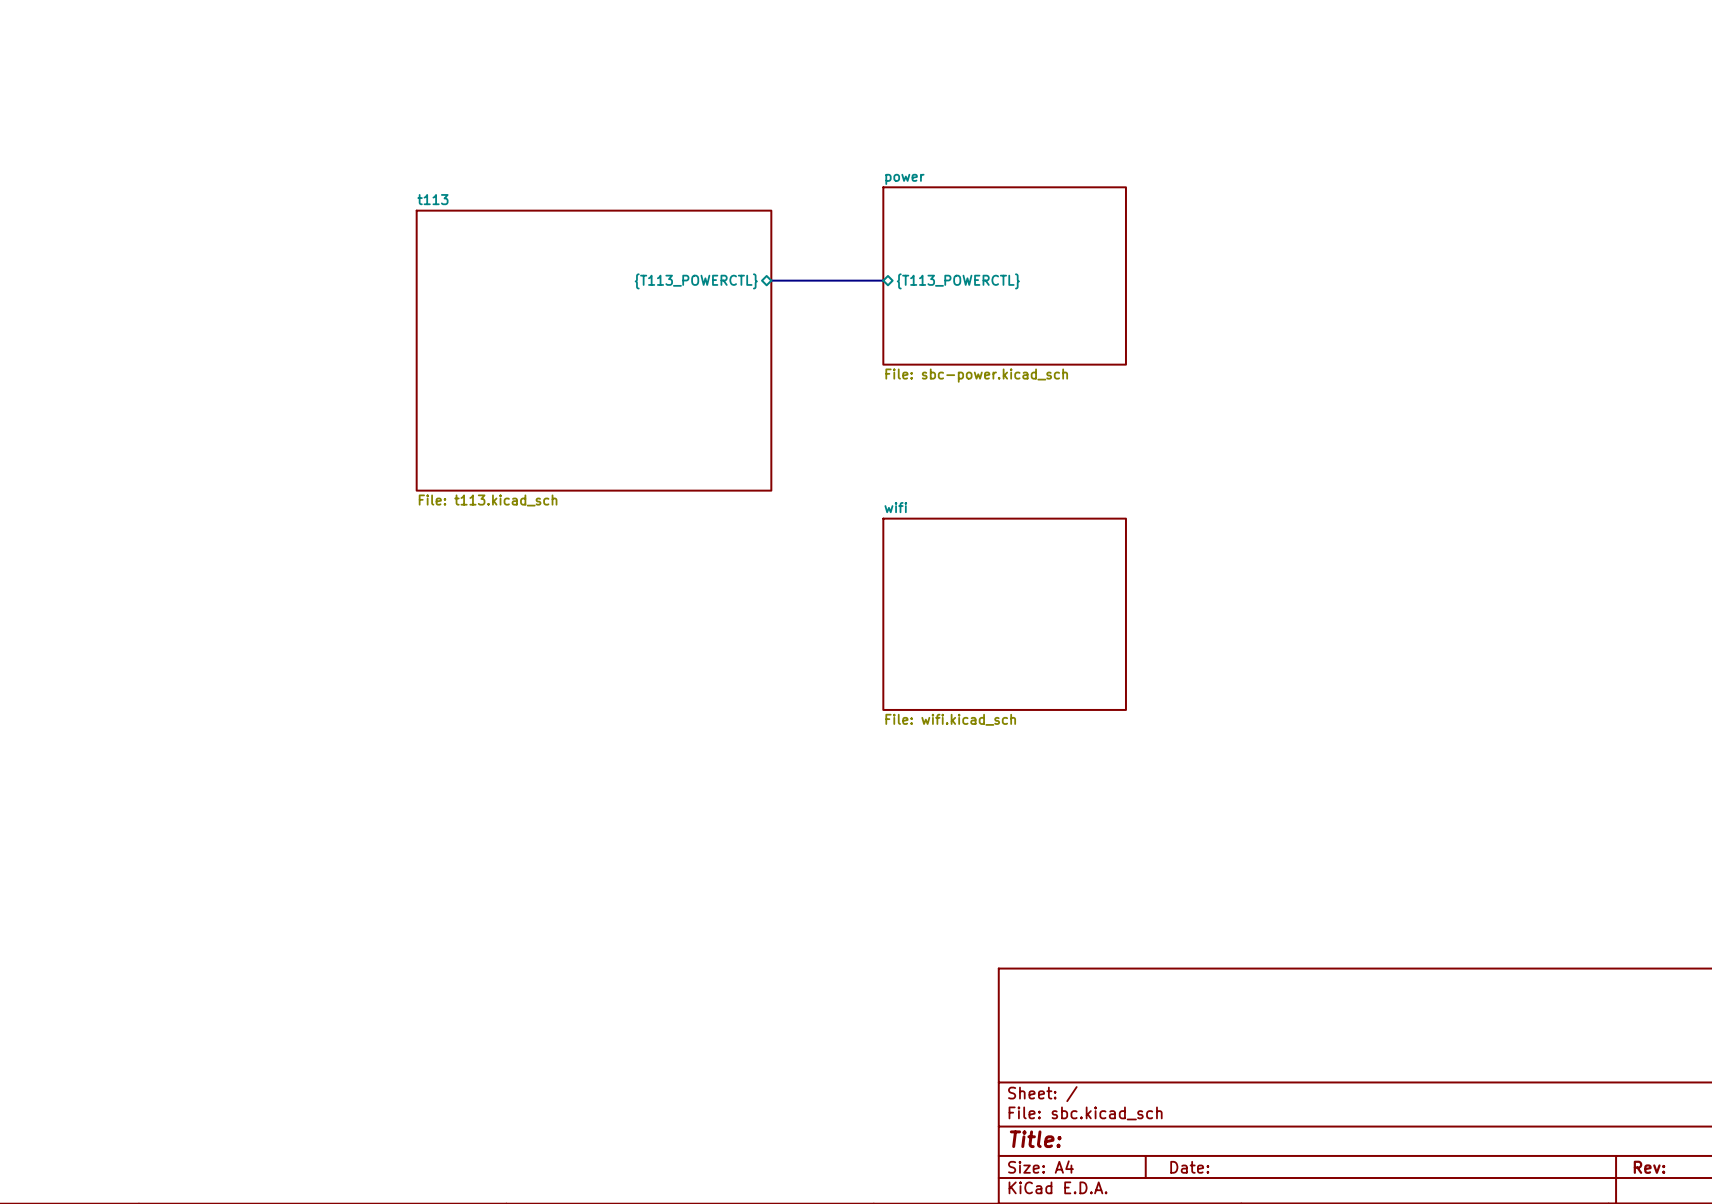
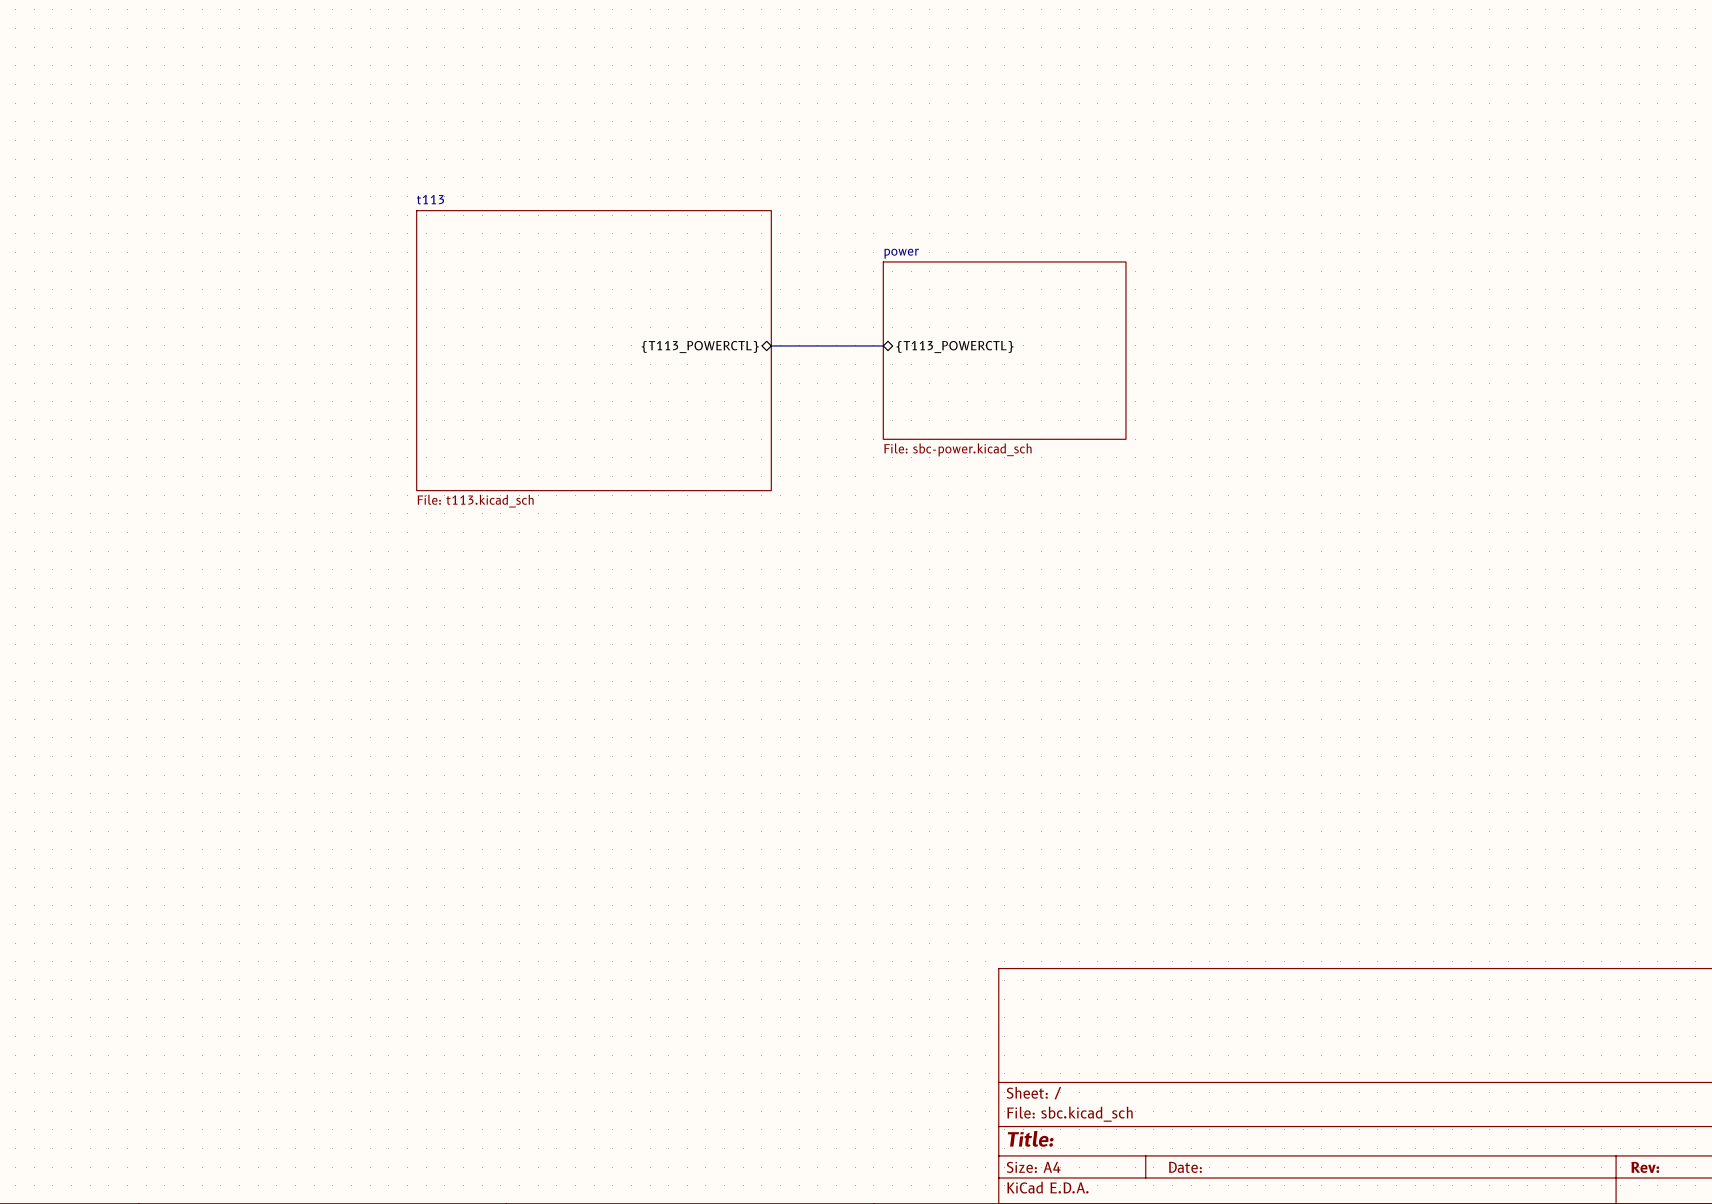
sheet power position: (1004, 275) -> (1004, 350)
bus: (771, 280) (883, 280) -> (771, 345) (883, 345)
sheet pin position: {T113_POWERCTL} (696, 281) -> {T113_POWERCTL} (700, 347)
sheet pin position: {T113_POWERCTL} (958, 281) -> {T113_POWERCTL} (955, 347)
sheet wifi: File: wifi.kicad_sch (1004, 614) -> none

